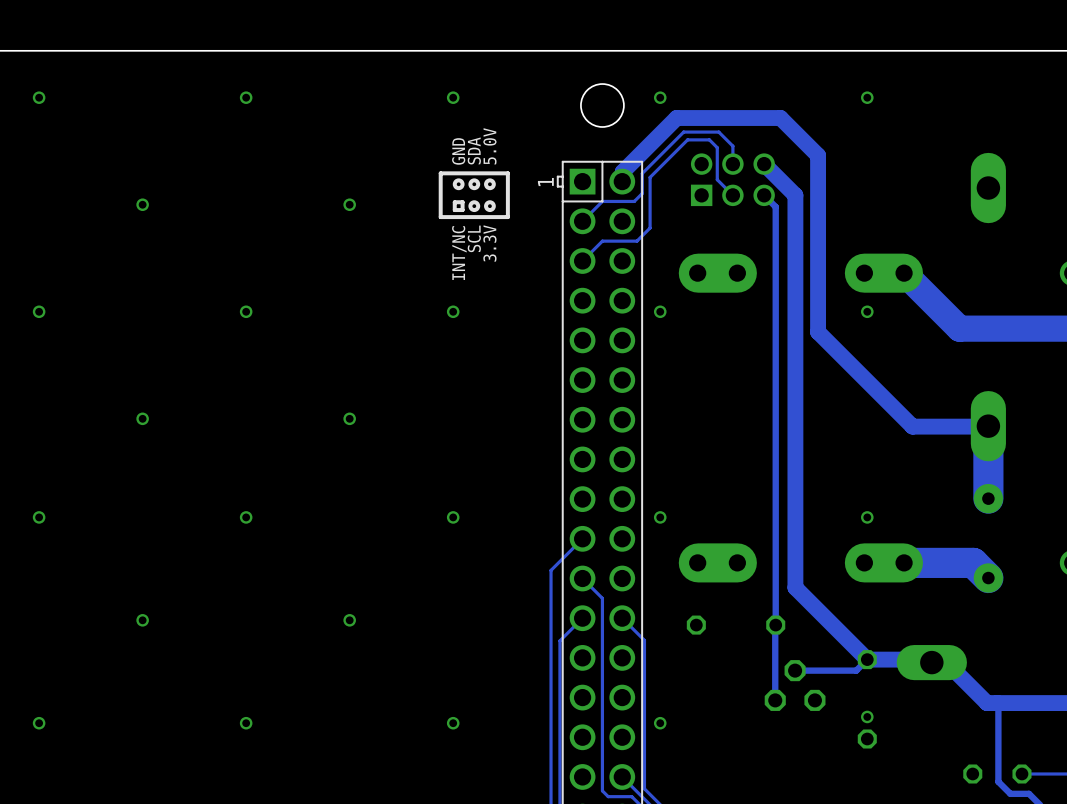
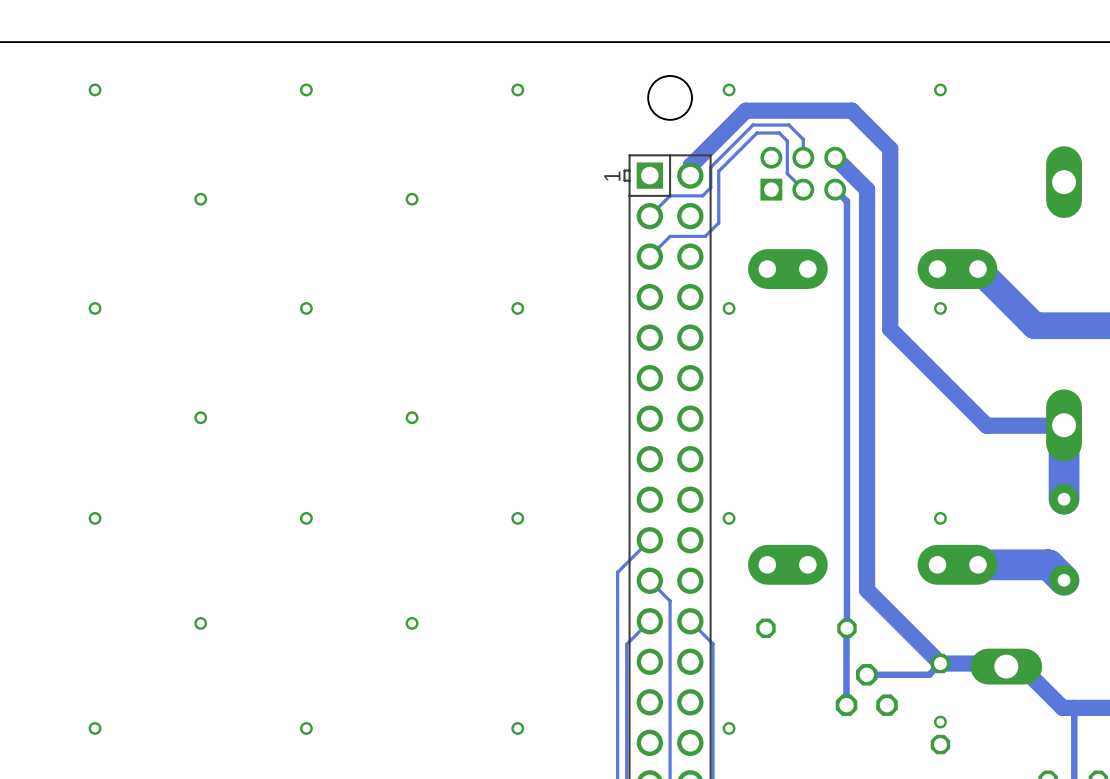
text: 5.0V (489, 146) -> none
text: SDA (474, 150) -> none
text: GND (458, 151) -> none
line: (507, 173) (440, 173) (440, 217) (507, 217) (507, 173) -> none
drawing: [452, 178, 496, 213] -> none
line: (462, 202) (454, 202) (454, 210) (462, 210) (462, 202) -> none
text: SCL (474, 238) -> none
text: 3.3V (489, 243) -> none
text: INT/NC (459, 253) -> none

